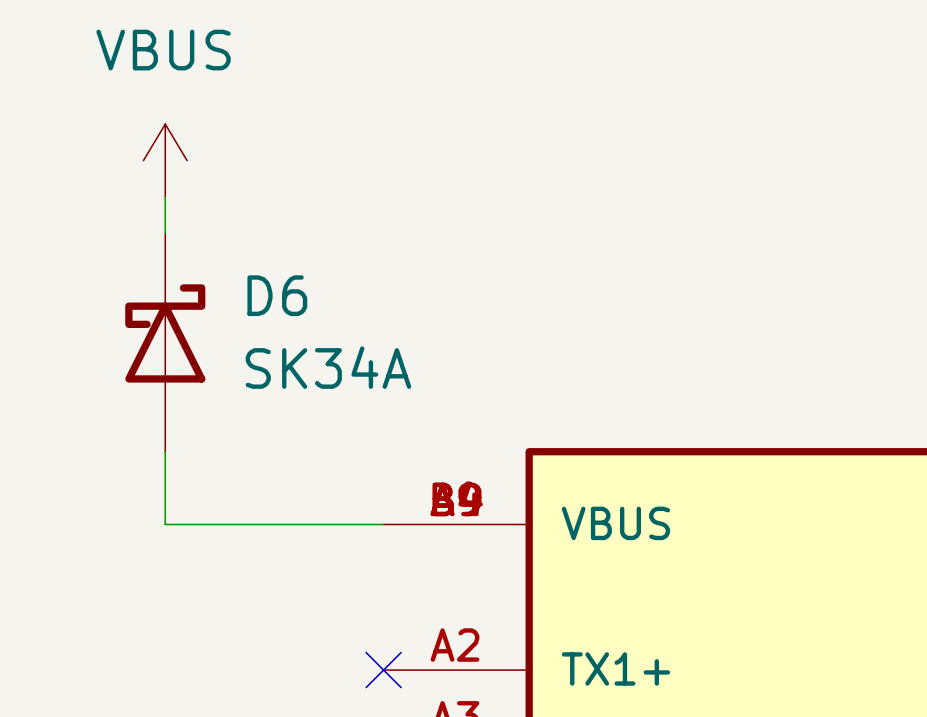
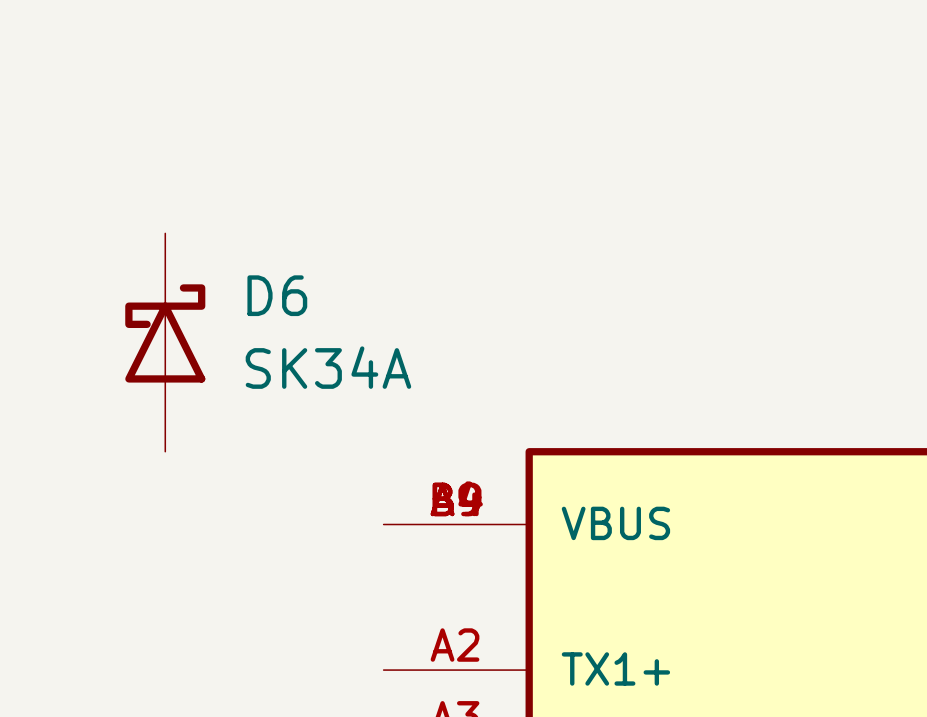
power symbol: VBUS (165, 160) -> none
wire: (165, 196) (165, 233) -> none
wire: (165, 451) (165, 524) (383, 524) -> none
no-connect mark: (383, 670) -> none

